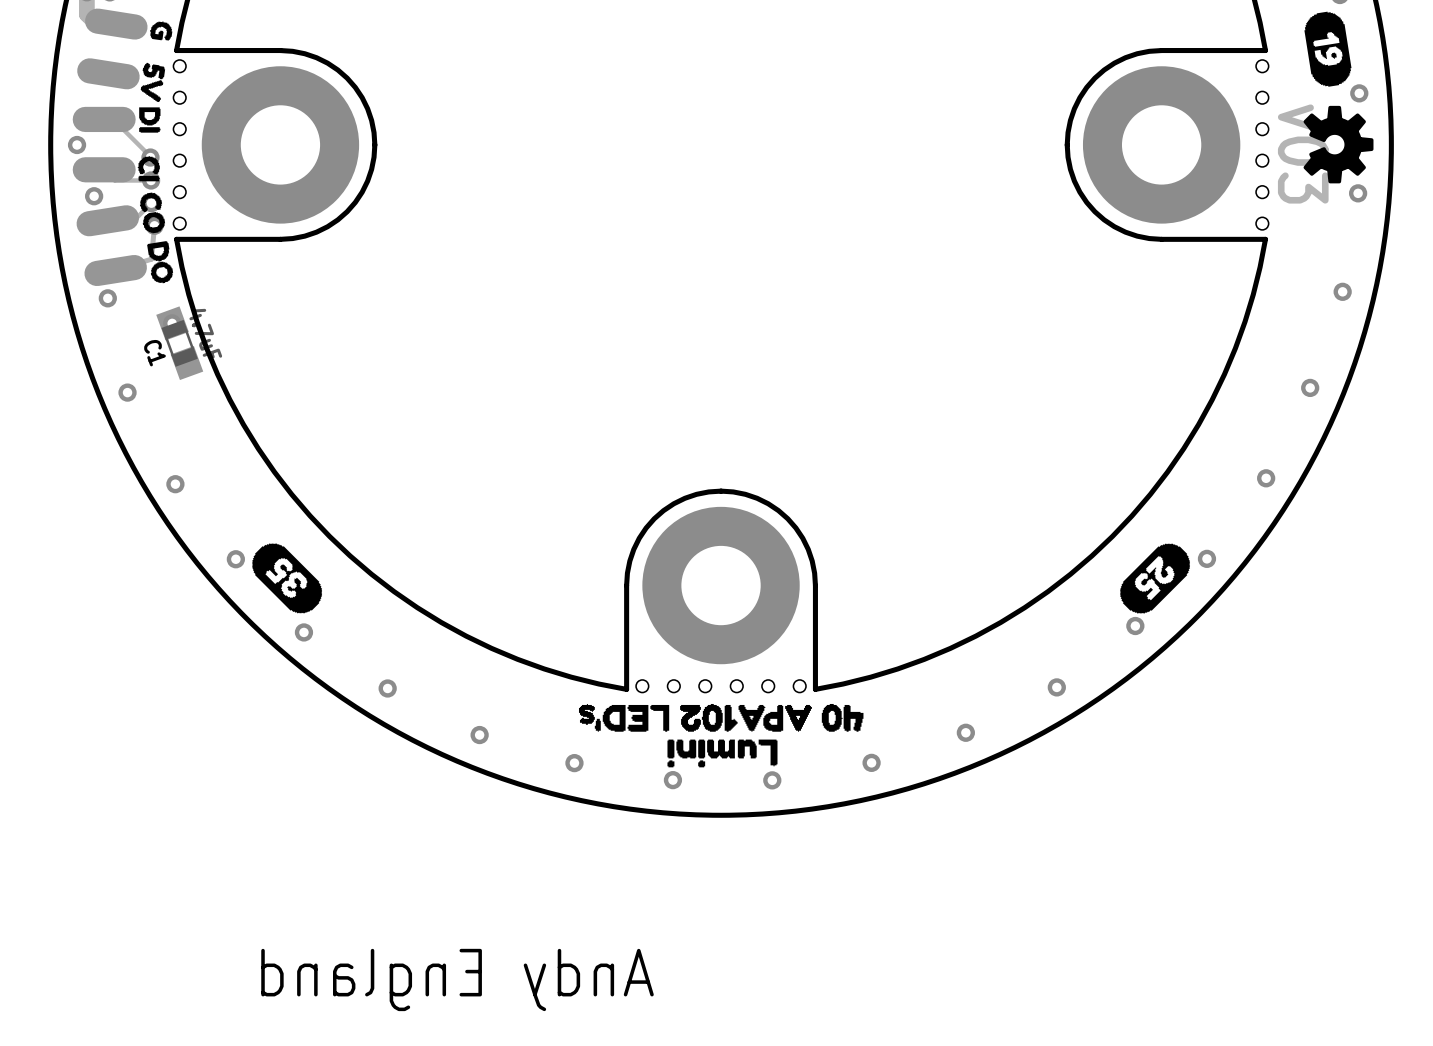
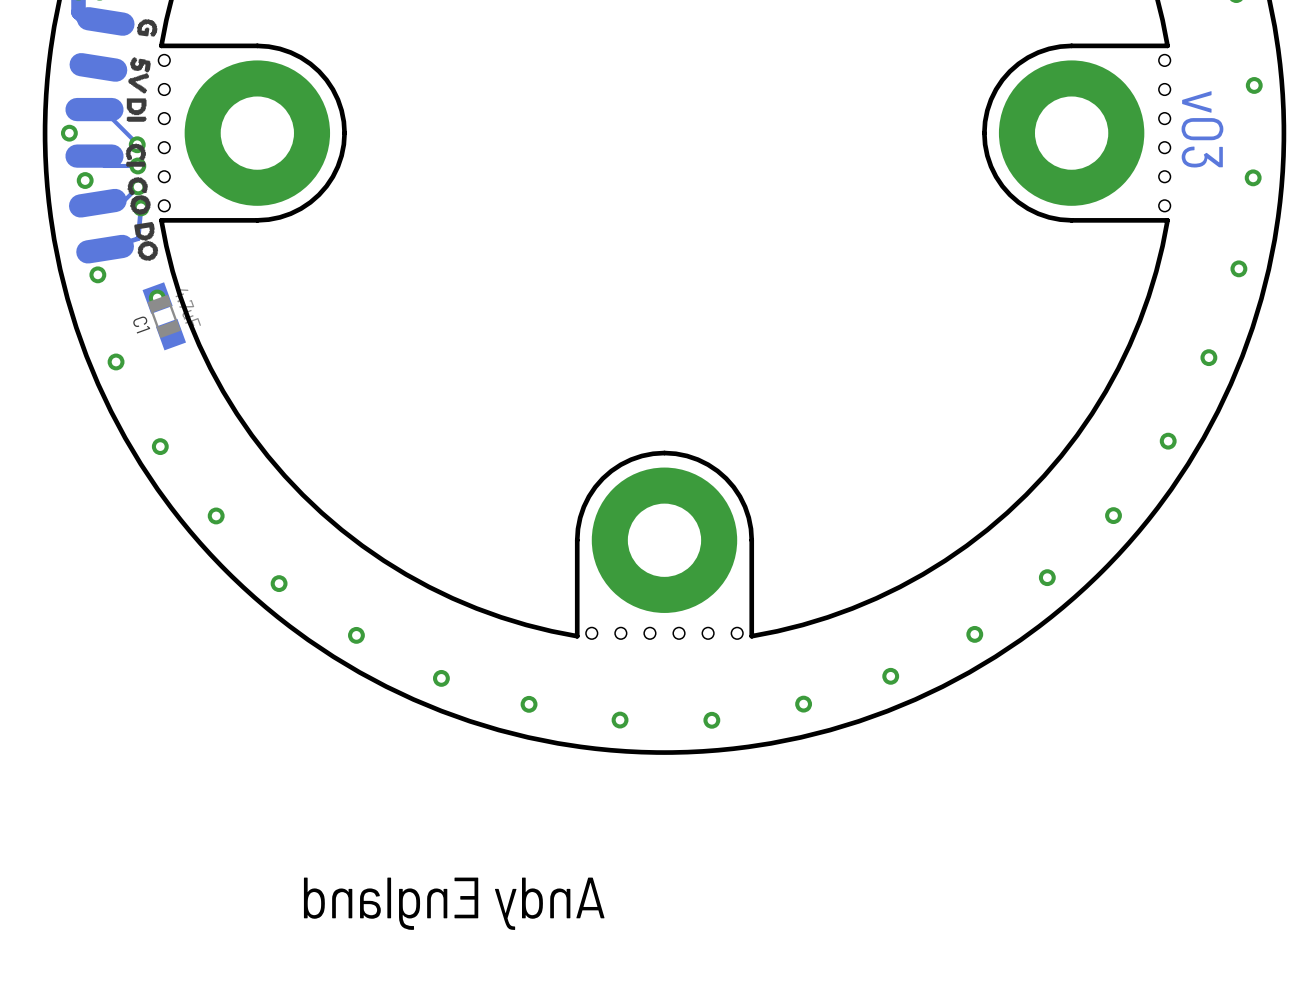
drawing: [1303, 11, 1374, 184] -> none
drawing: [252, 543, 323, 614] -> none
drawing: [1120, 543, 1191, 614] -> none
drawing: [578, 703, 864, 768] -> none

